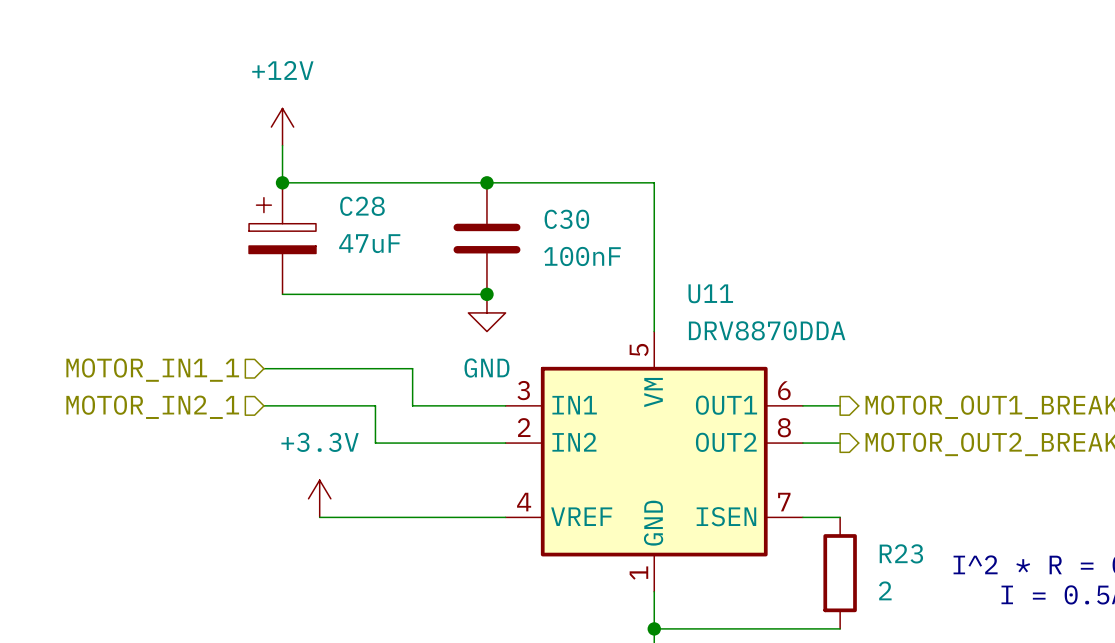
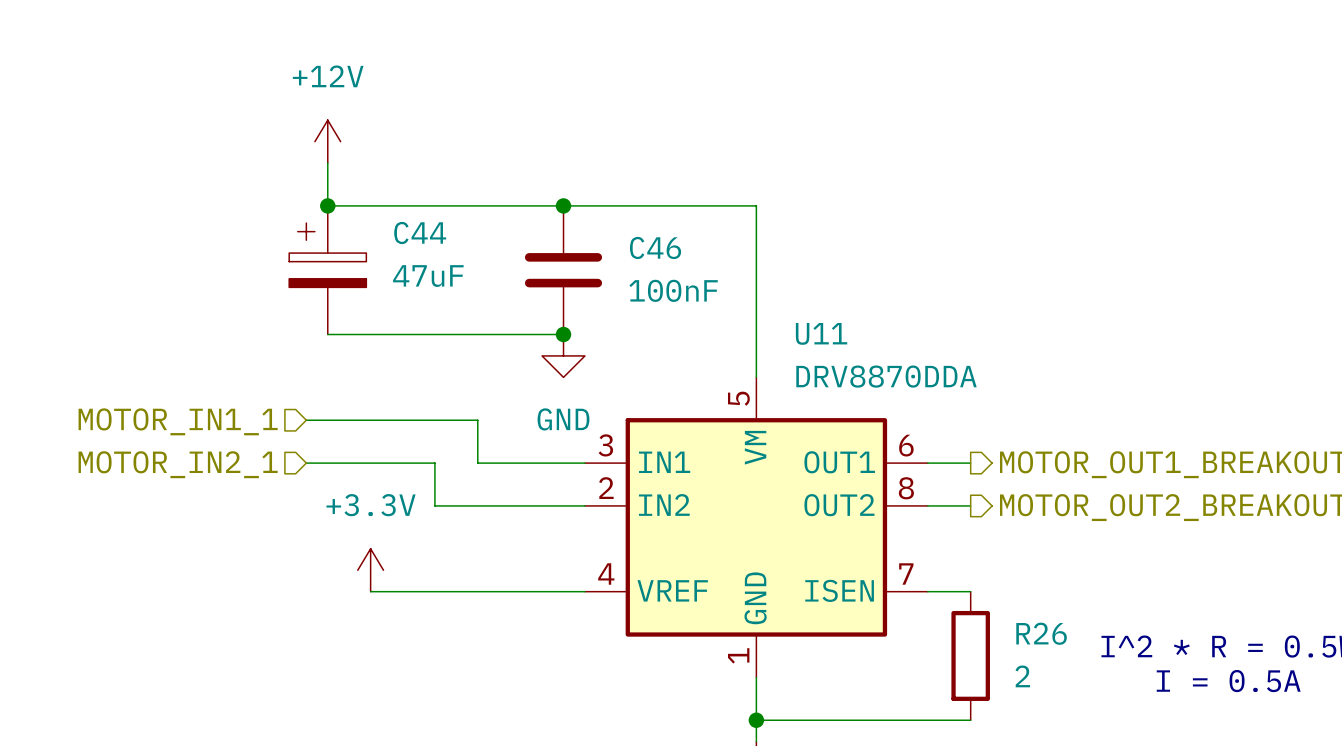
C28 name: C28 (362, 206) -> C44 (420, 232)
C30 name: C30 (566, 219) -> C46 (655, 247)
R23 name: R23 (901, 553) -> R26 (1041, 633)

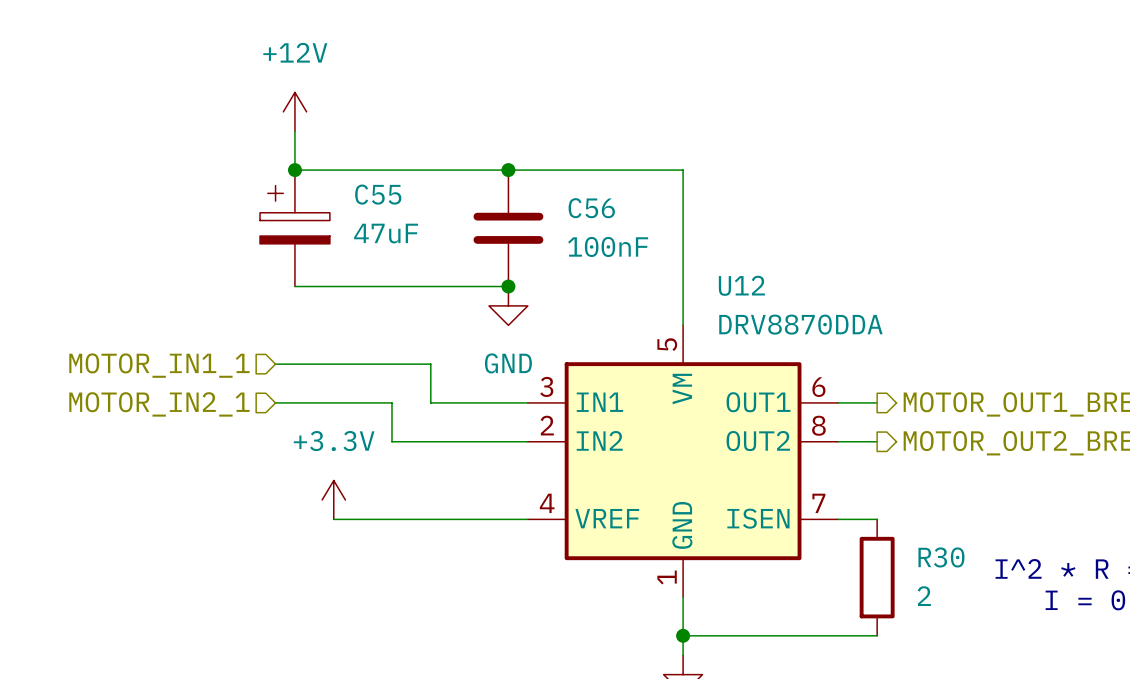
C44 name: C44 (420, 232) -> C55 (378, 194)
C46 name: C46 (655, 247) -> C56 (591, 208)
U11 name: U11 (821, 333) -> U12 (741, 285)
R26 name: R26 (1041, 633) -> R30 (941, 557)

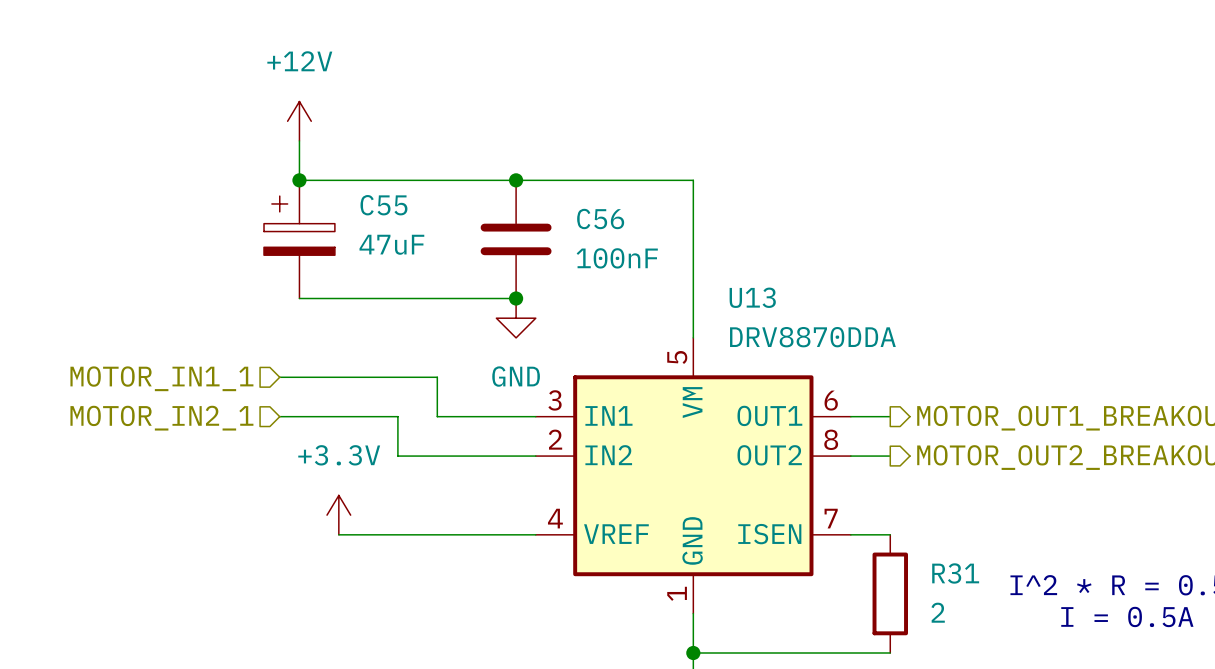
U12 name: U12 (741, 285) -> U13 (752, 297)
R30 name: R30 (941, 557) -> R31 (955, 573)

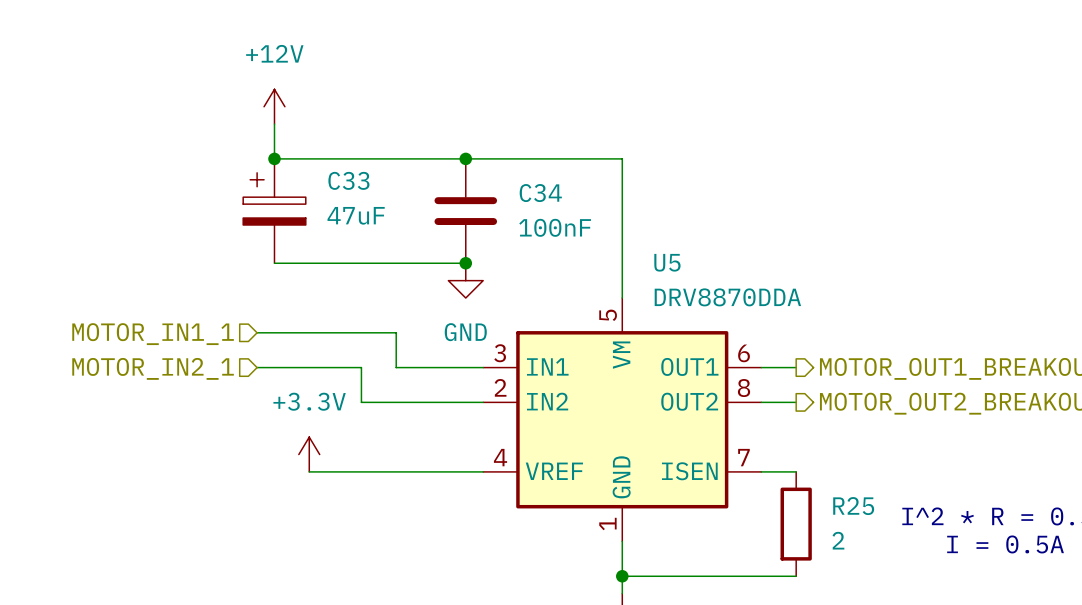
C55 name: C55 (383, 205) -> C33 (348, 180)
C56 name: C56 (600, 218) -> C34 (540, 193)
U13 name: U13 (752, 297) -> U5 (667, 262)
R31 name: R31 (955, 573) -> R25 (853, 506)

